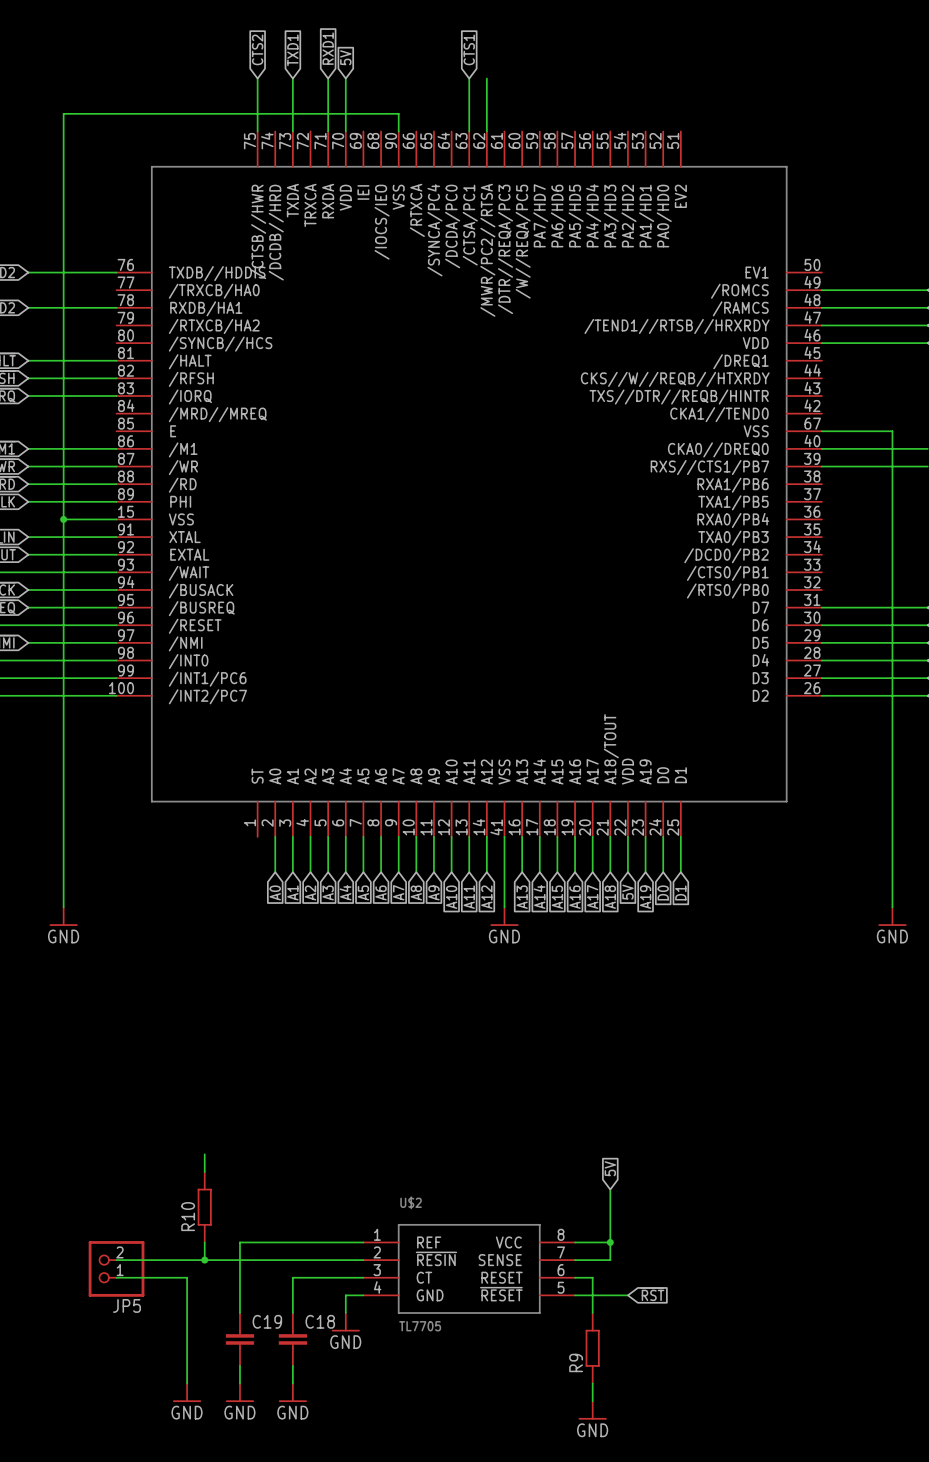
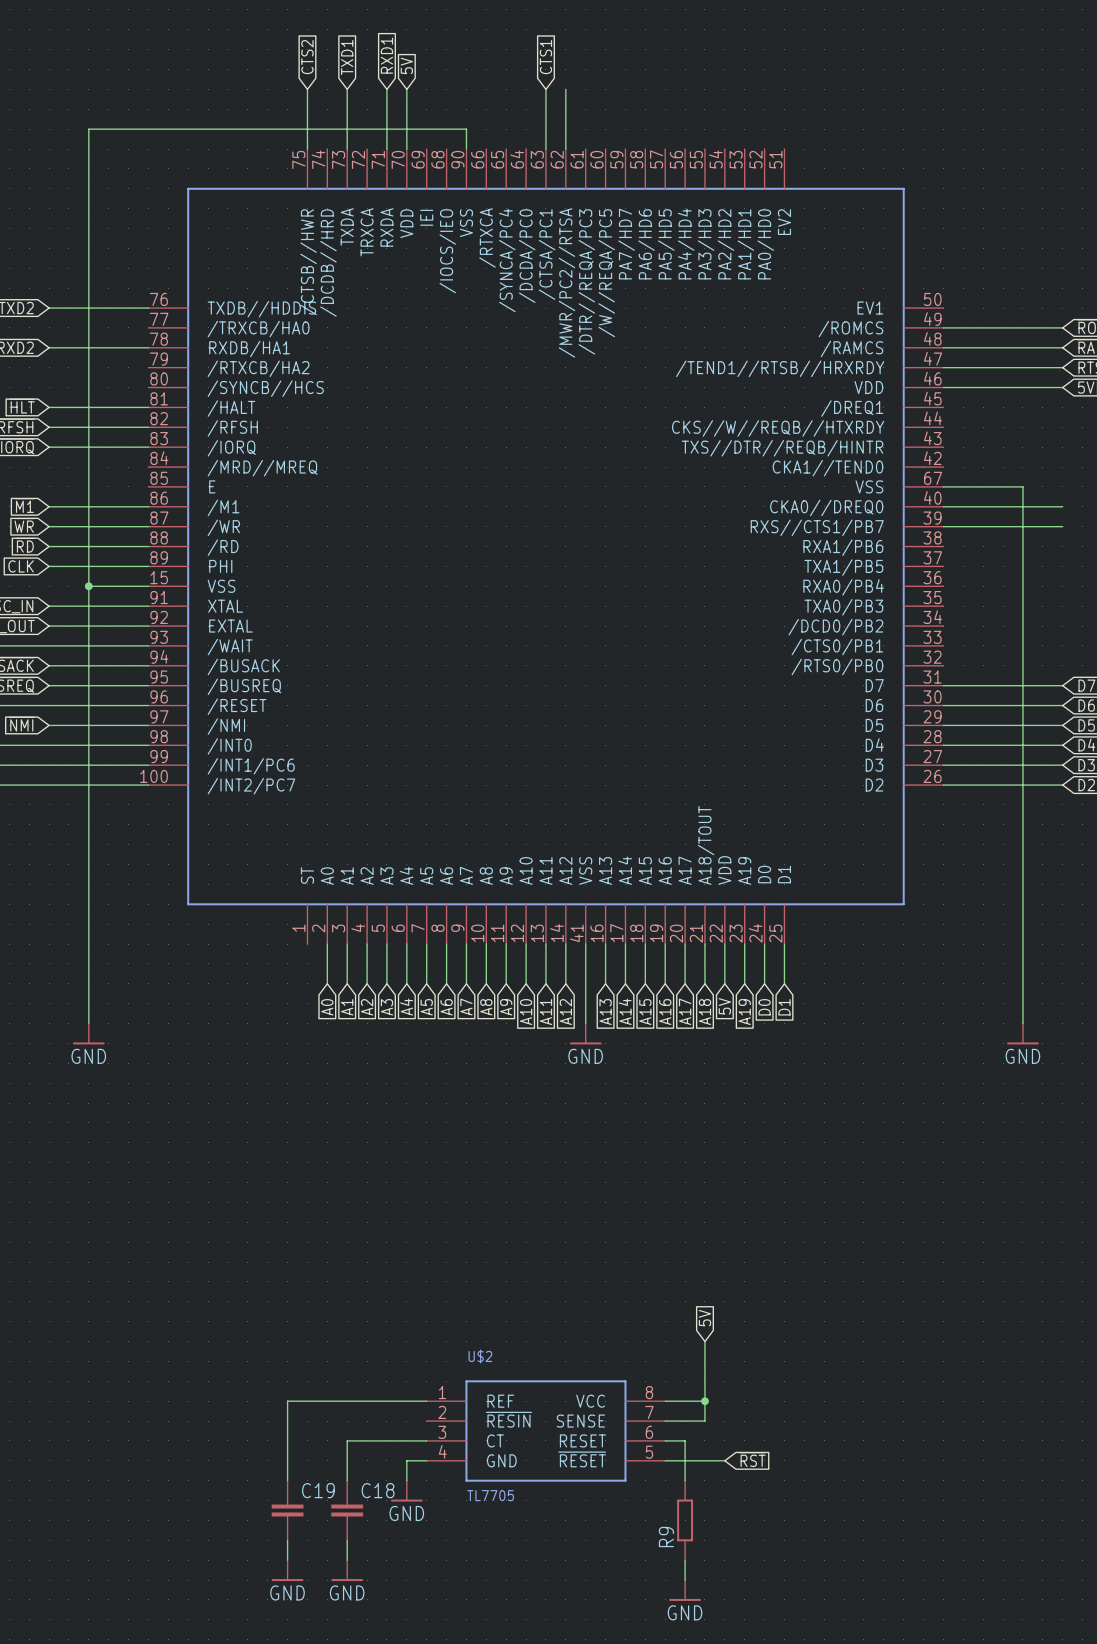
wire: (204, 1154) (204, 1171) -> none
R10: (204, 1207) -> none
wire: (204, 1242) (204, 1260) -> none
wire: (116, 1260) (363, 1260) -> none
junction: (204, 1260) -> none
JP5: (116, 1268) -> none
wire: (116, 1277) (187, 1277) (187, 1383) -> none
power symbol: GND (187, 1392) -> none

